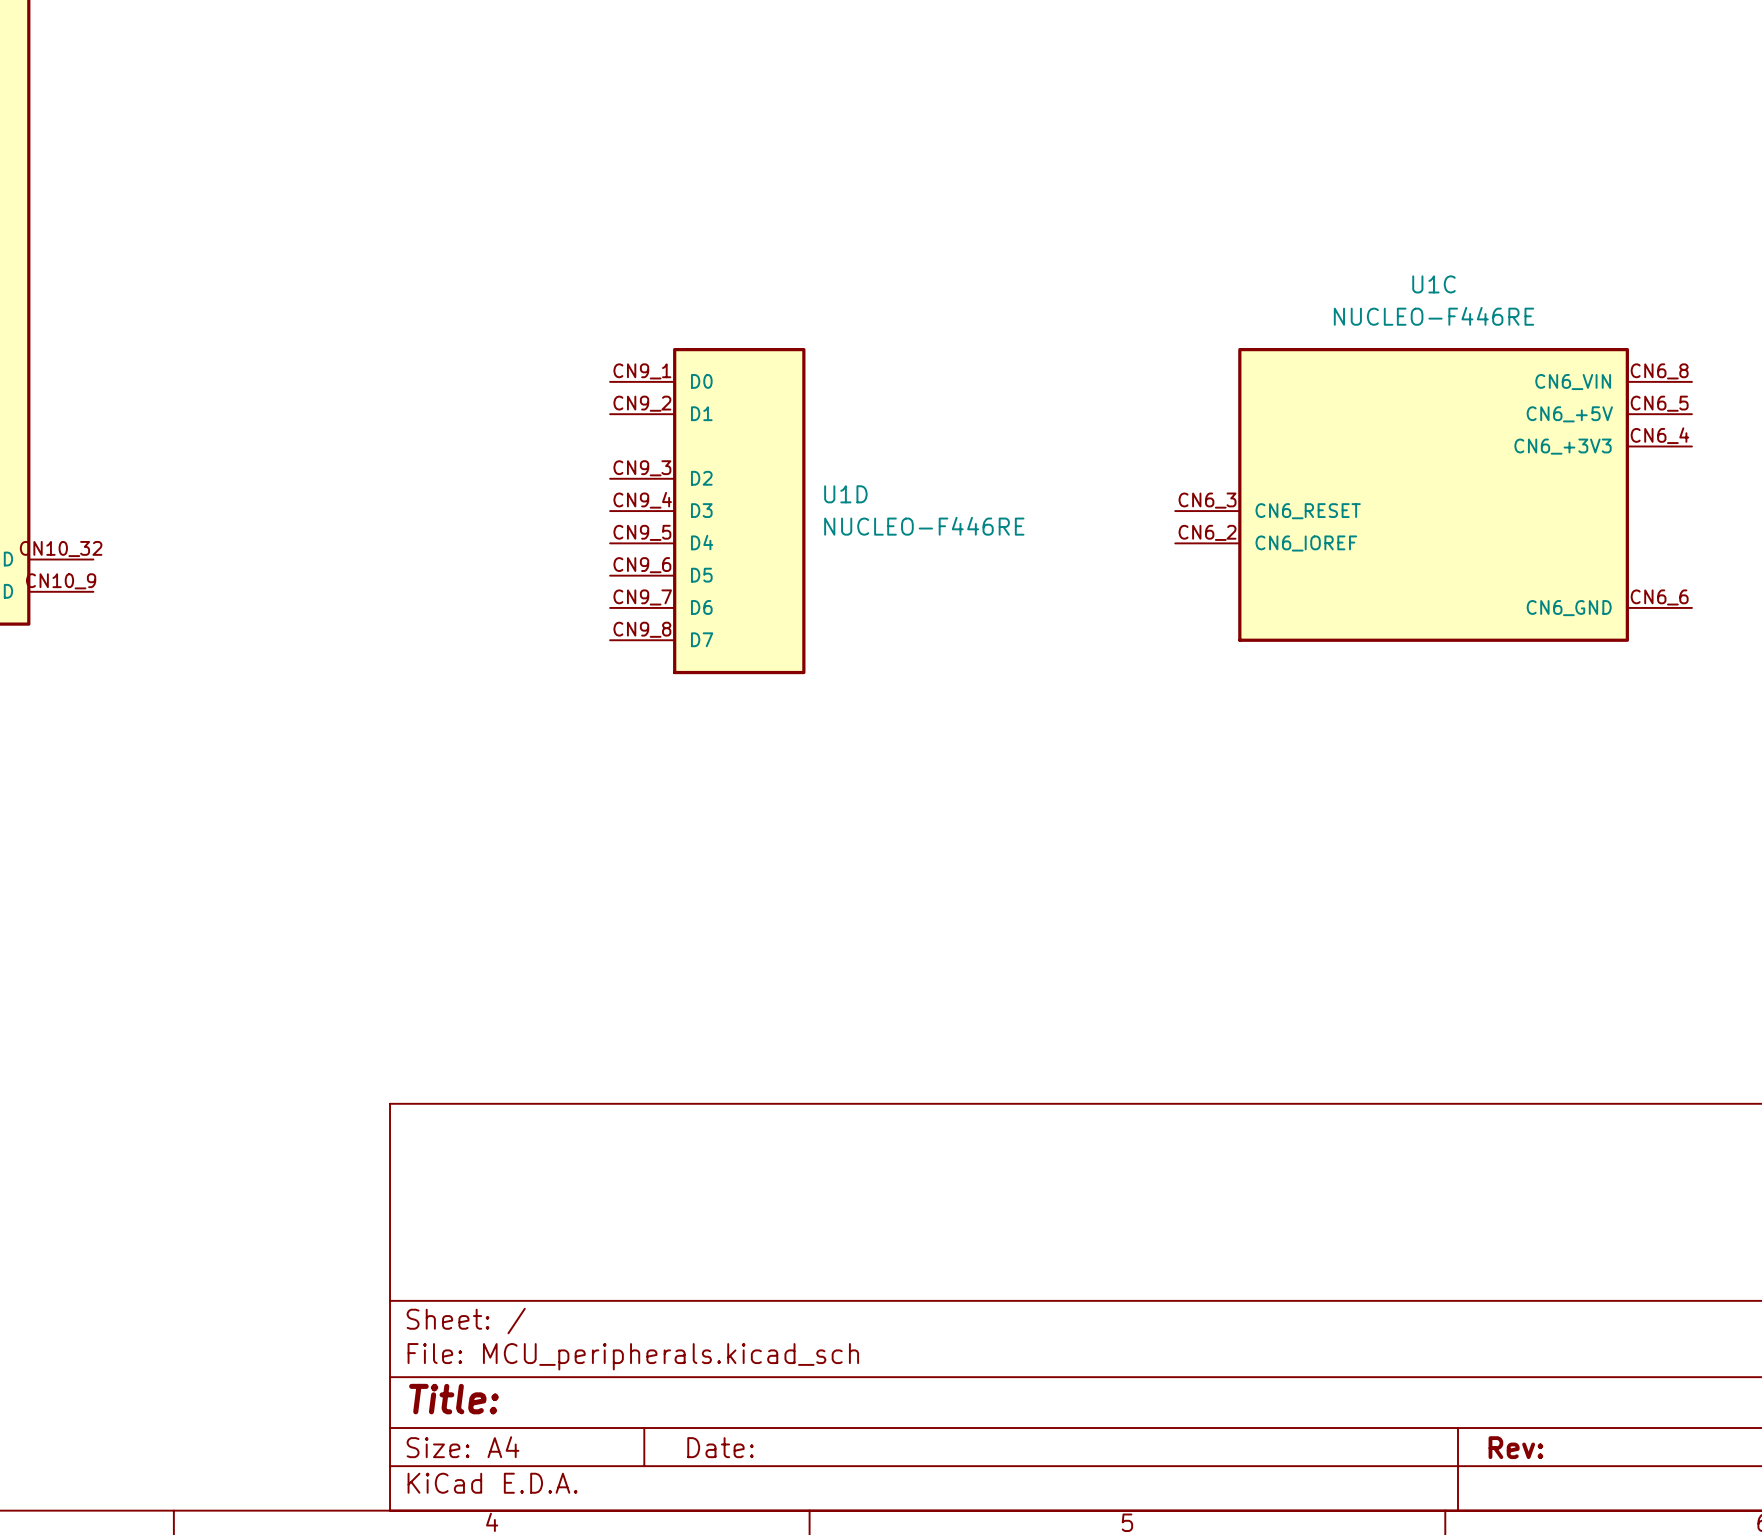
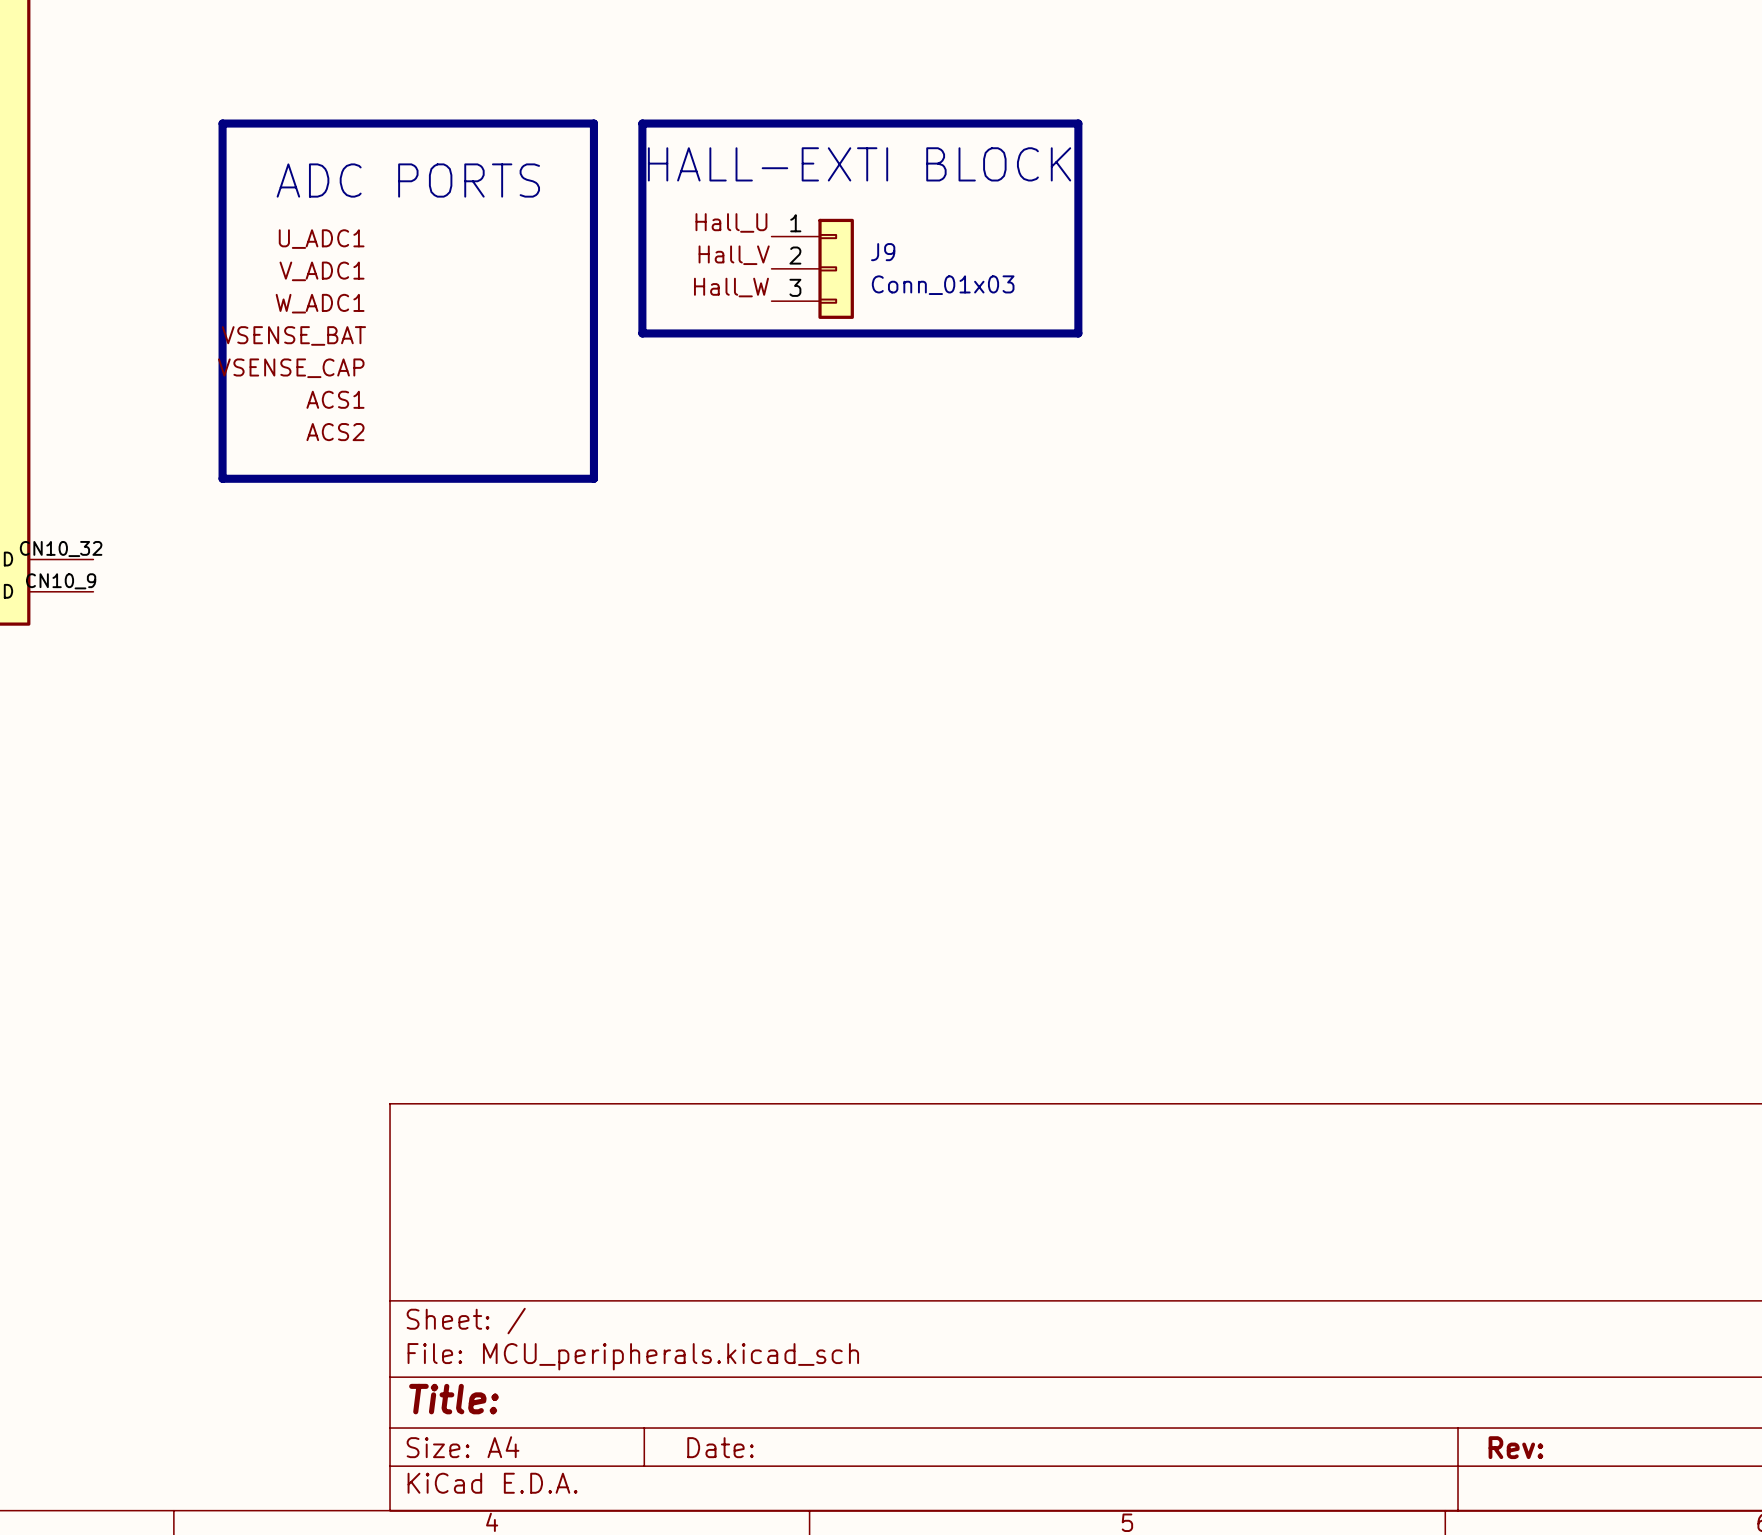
line: none -> (222, 123) (593, 123) (593, 478) (222, 478) (222, 123)
line: none -> (642, 123) (1078, 123) (1078, 333) (642, 333) (642, 123)
text: none -> HALL-EXTI BLOCK (859, 164)
text: none -> ADC PORTS (408, 180)
label: none -> Hall_U (731, 222)
label: none -> U_ADC1 (321, 239)
label: none -> Hall_V (734, 255)
J9: none -> Conn_01x03 (812, 268)
label: none -> V_ADC1 (322, 271)
label: none -> Hall_W (731, 287)
label: none -> W_ADC1 (320, 303)
label: none -> VSENSE_BAT (293, 335)
label: none -> VSENSE_CAP (291, 368)
label: none -> ACS1 (335, 399)
label: none -> ACS2 (335, 432)
U1C: NUCLEO-F446RE (1433, 494) -> none
U1D: NUCLEO-F446RE (707, 511) -> none

